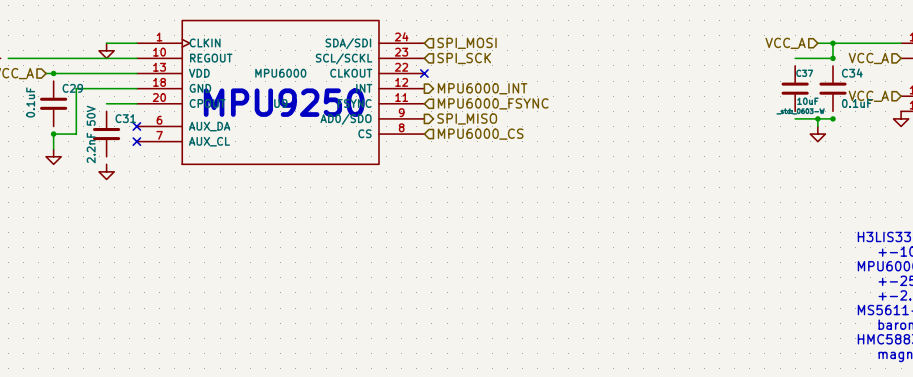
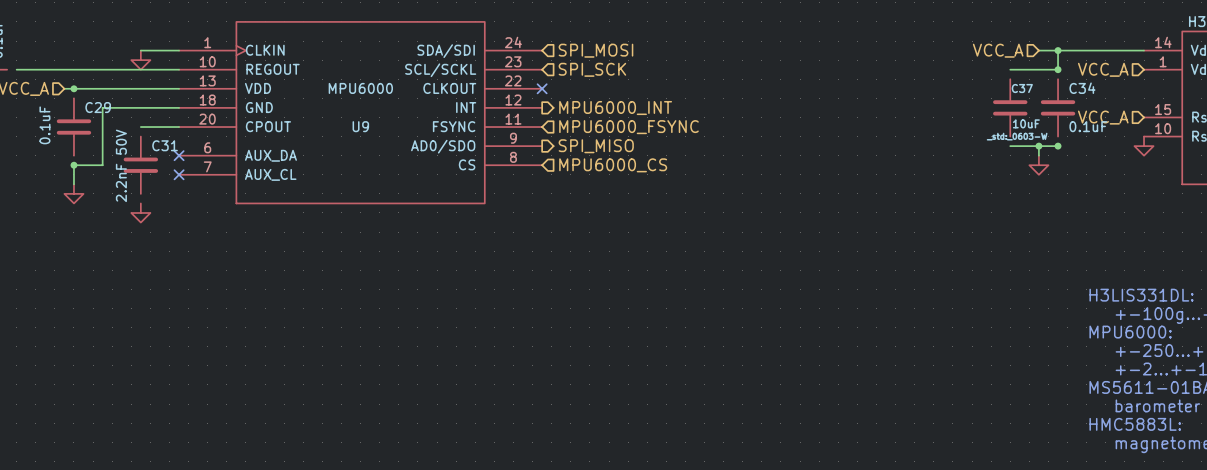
text: MPU9250 (284, 102) -> none

